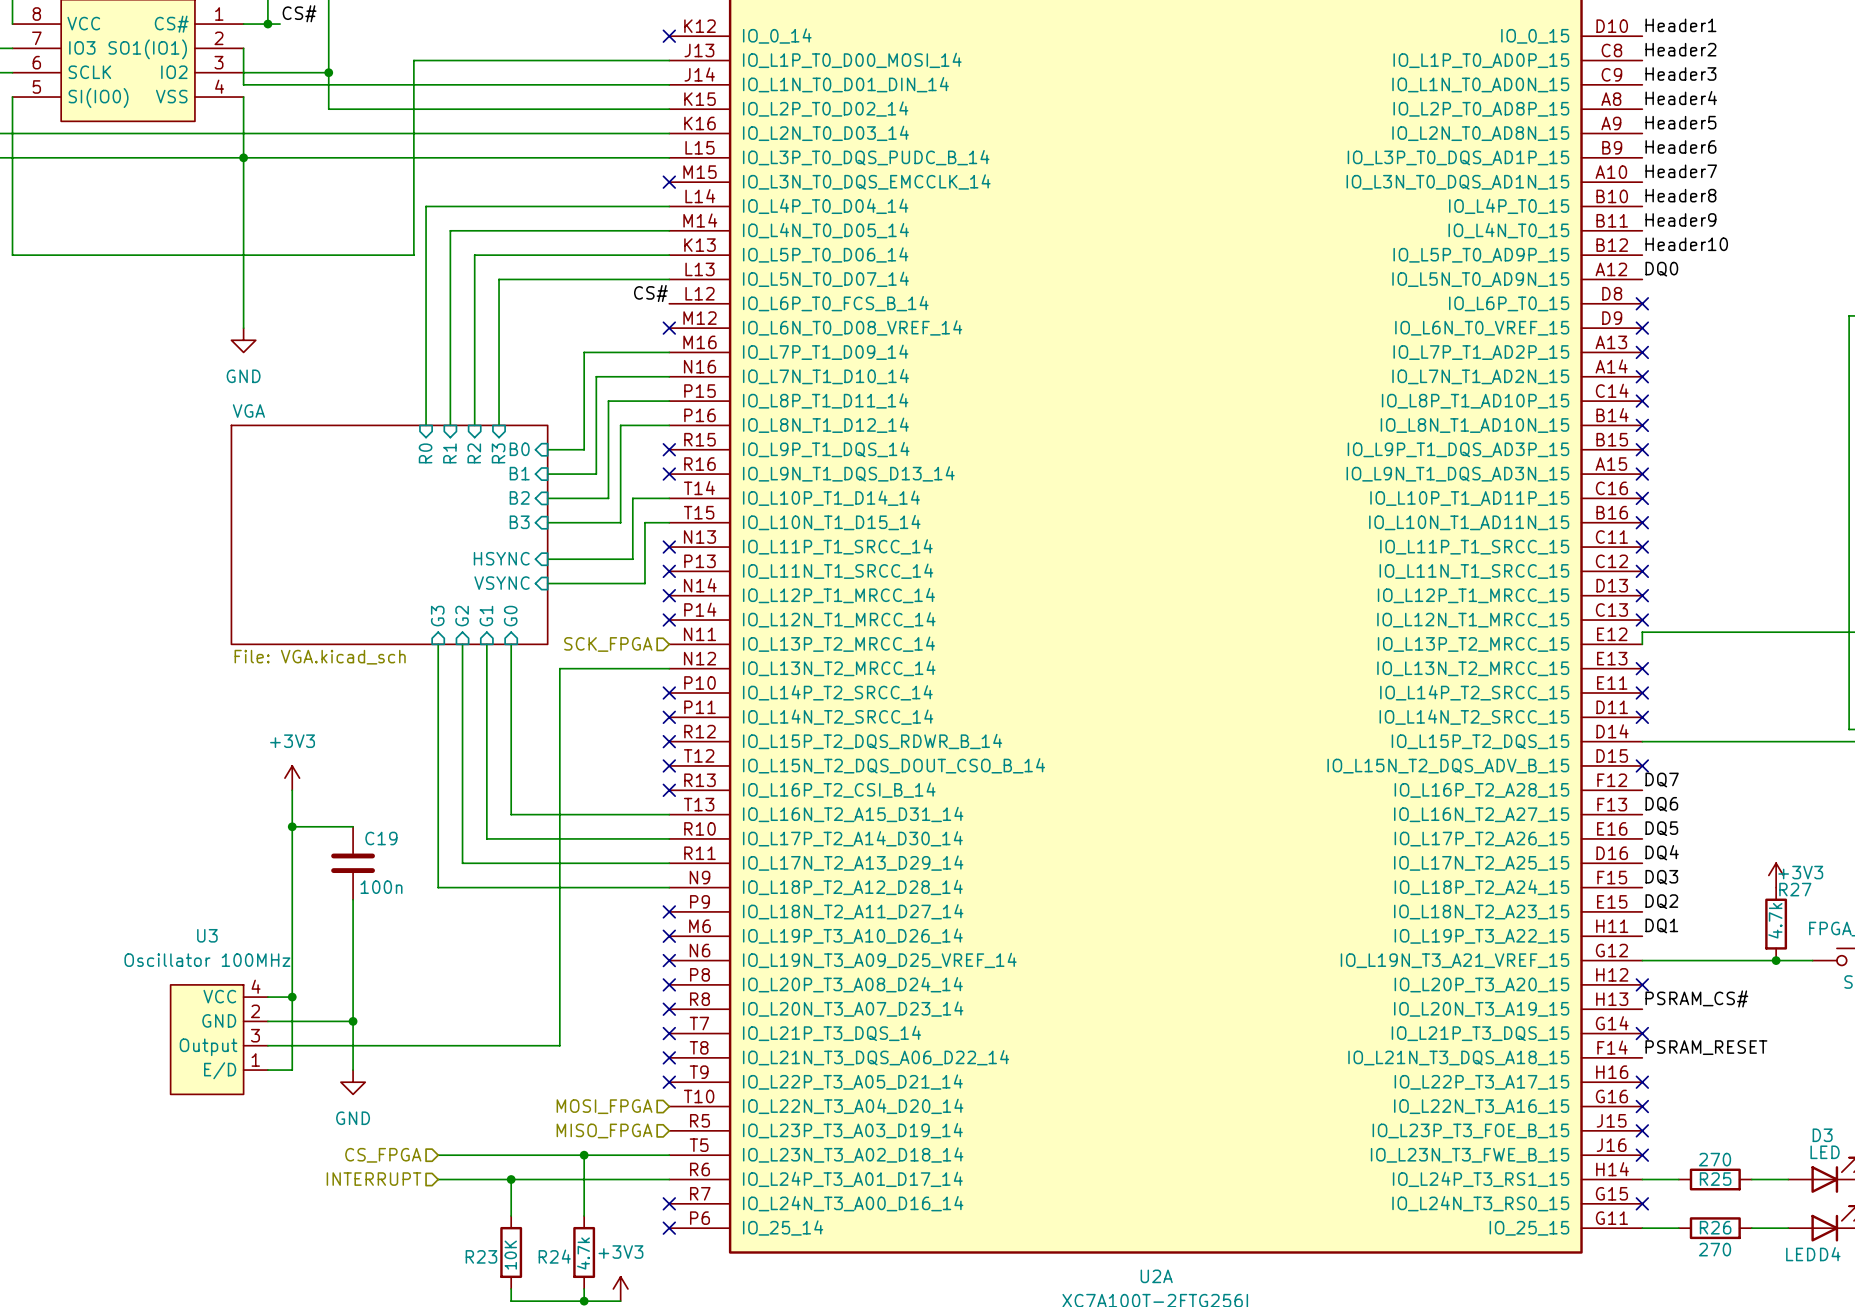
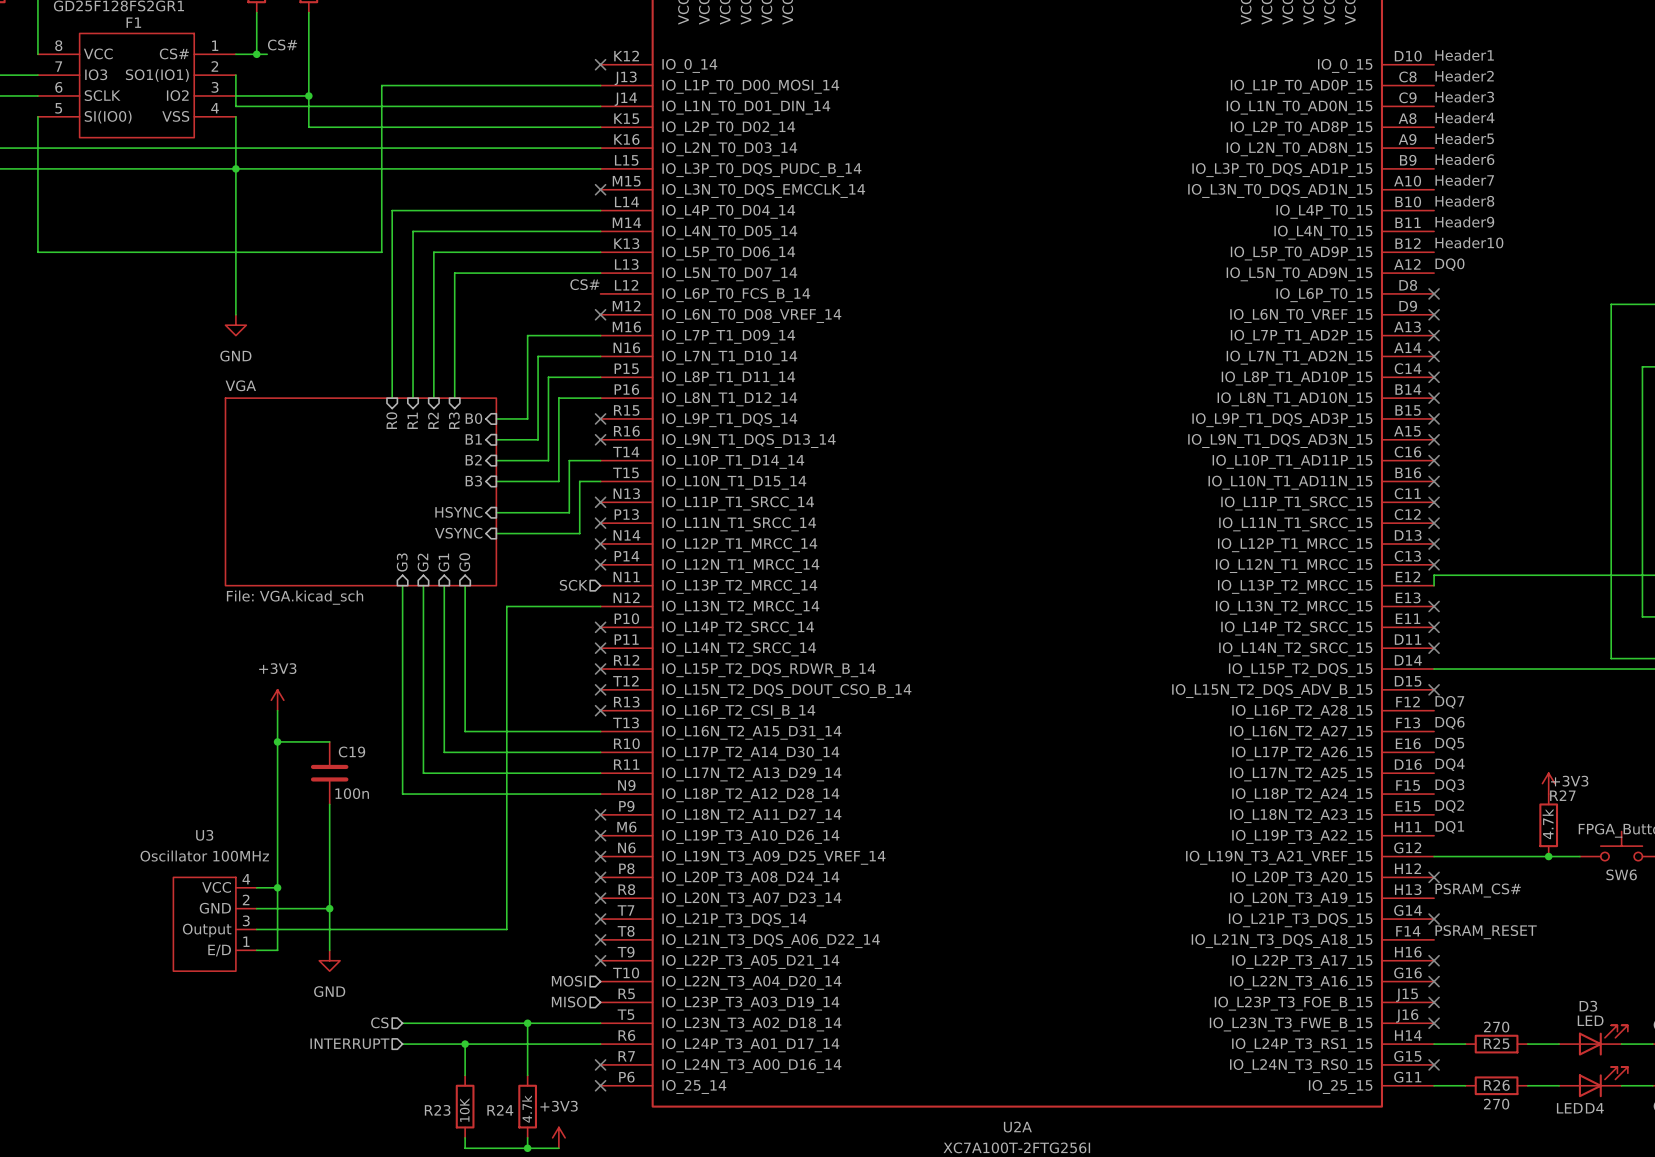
hierarchical label: SCK_FPGA (608, 644) -> SCK (573, 585)
hierarchical label: MOSI_FPGA (604, 1106) -> MOSI (568, 981)
hierarchical label: MISO_FPGA (604, 1130) -> MISO (569, 1002)
hierarchical label: CS_FPGA (383, 1155) -> CS (379, 1022)

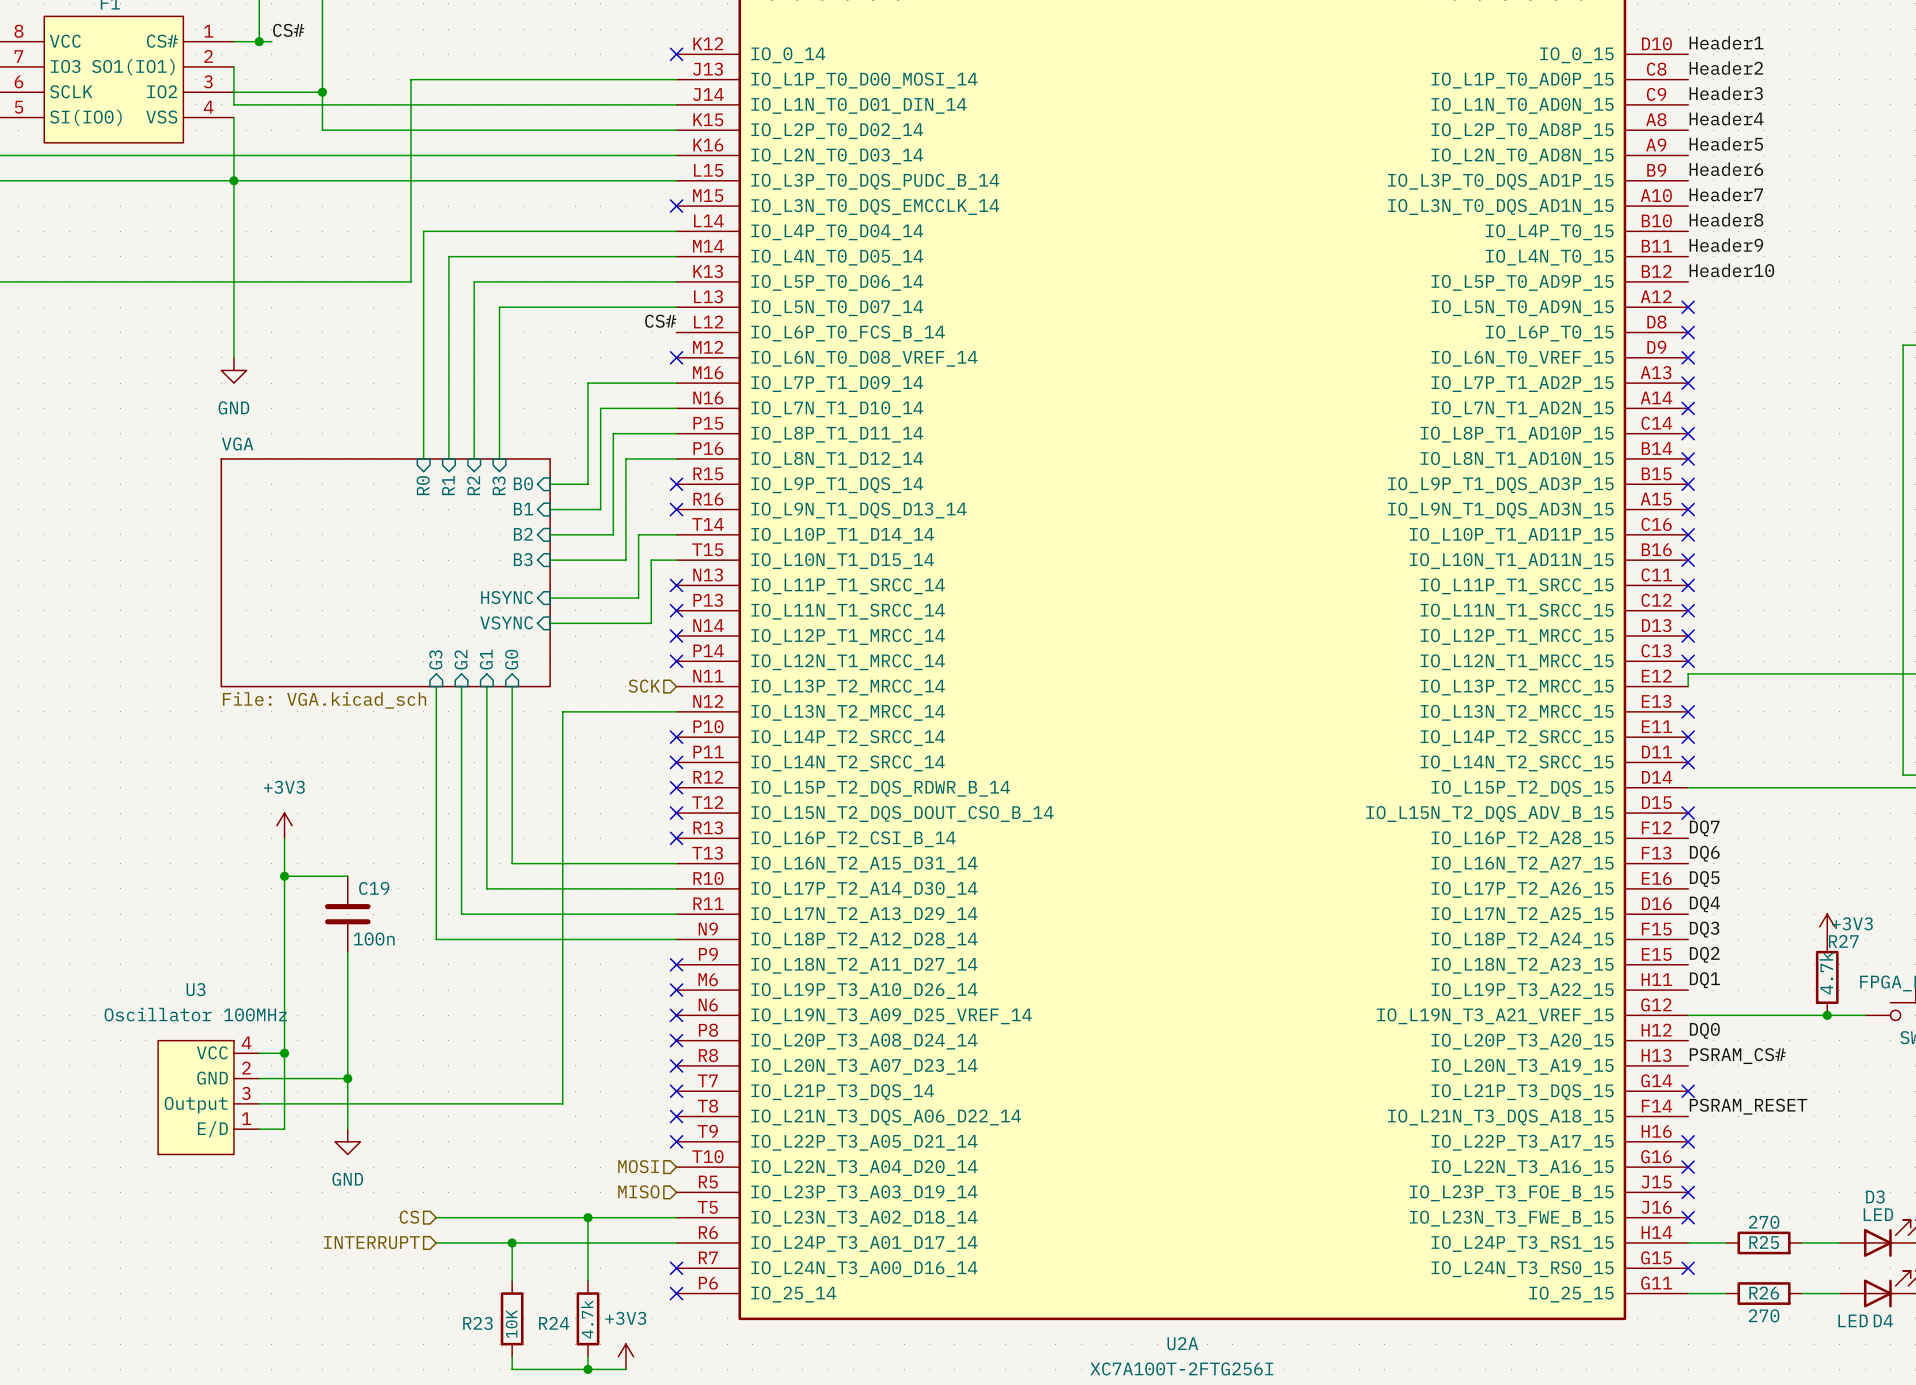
label: DQ0 (1449, 264) -> none
no-connect mark: none -> (1688, 307)
label: none -> DQ0 (1704, 1030)
no-connect mark: (1434, 877) -> none

